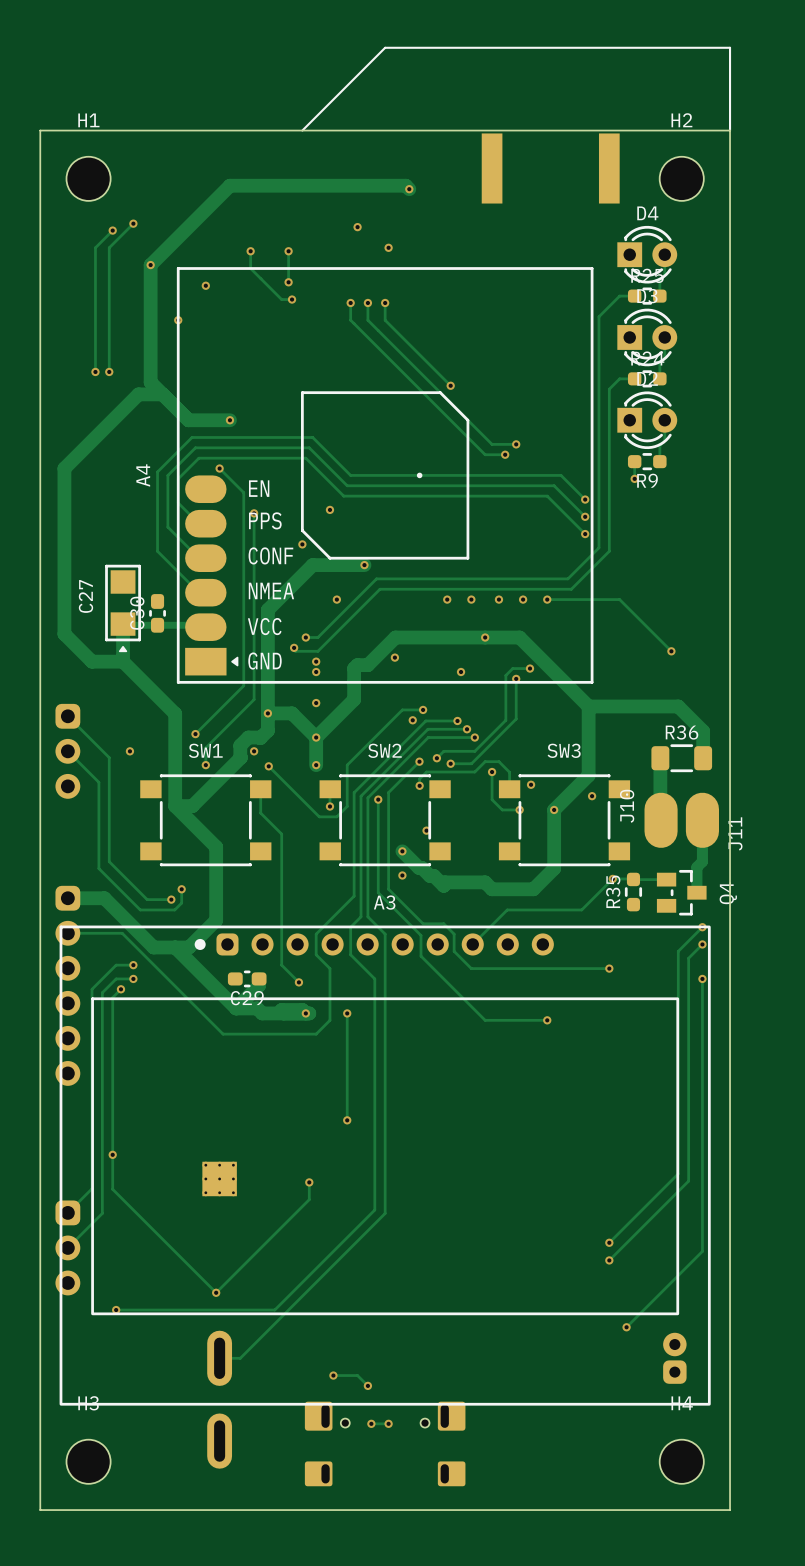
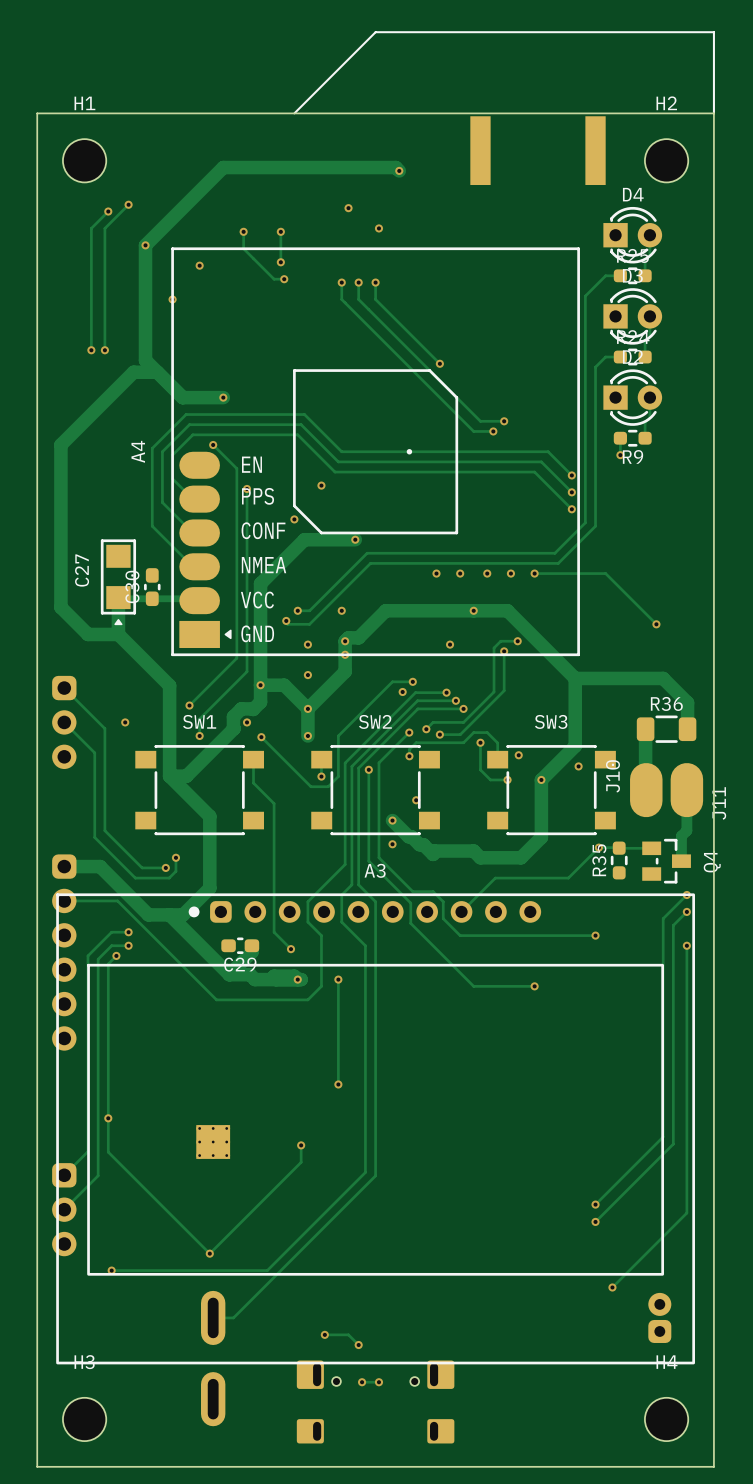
via: (336, 599) -> none
via: none -> (341, 610)
via: (394, 657) -> none
via: (316, 661) -> none
via: none -> (345, 641)
via: none -> (345, 654)

